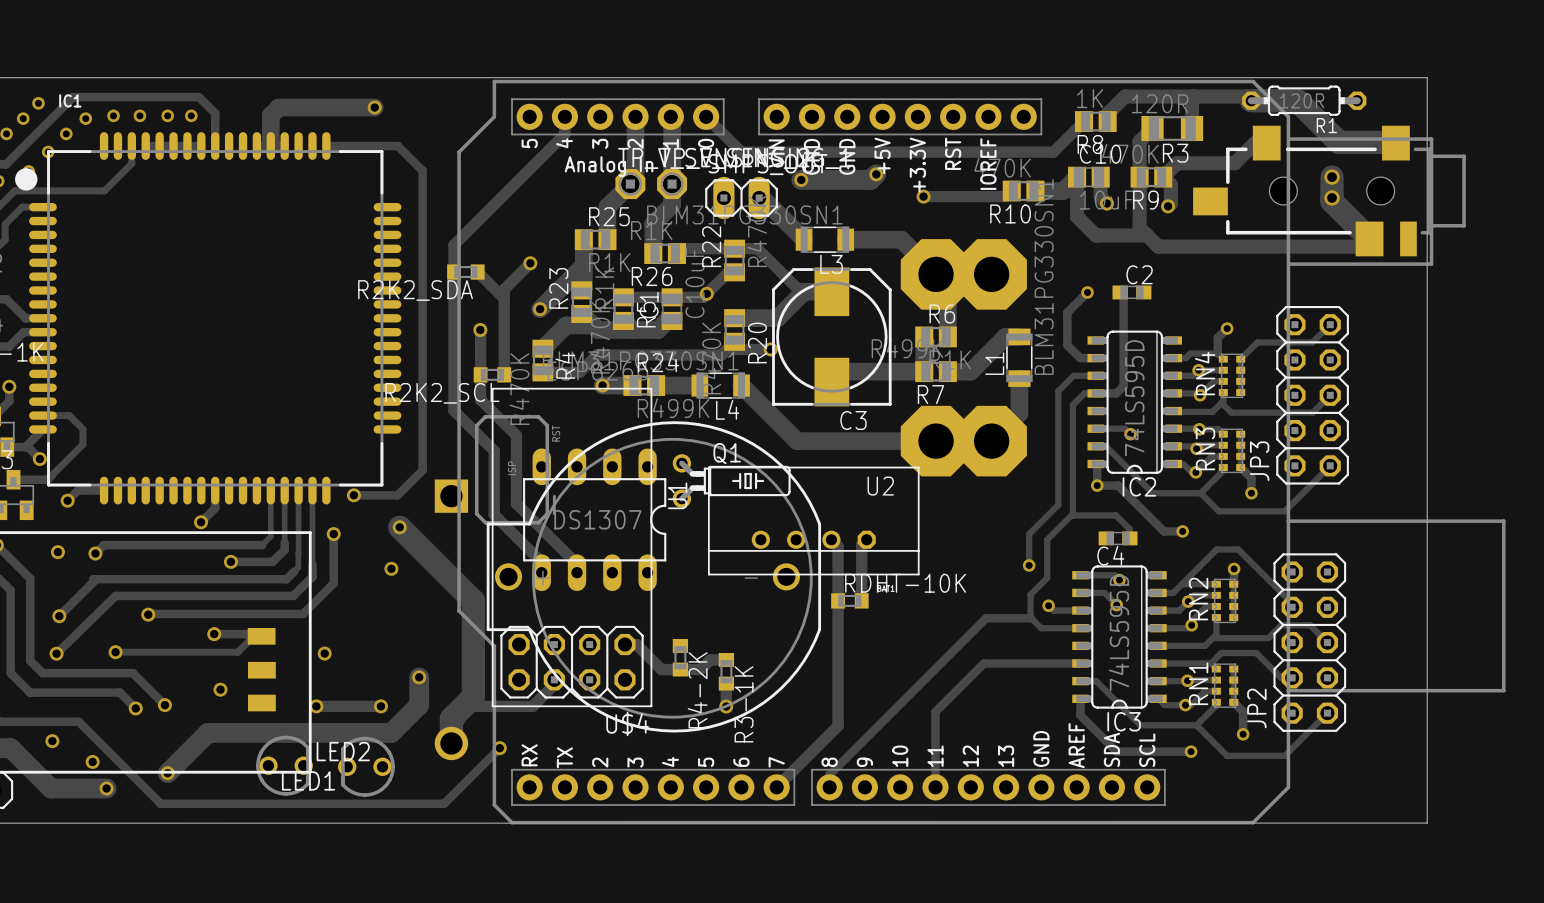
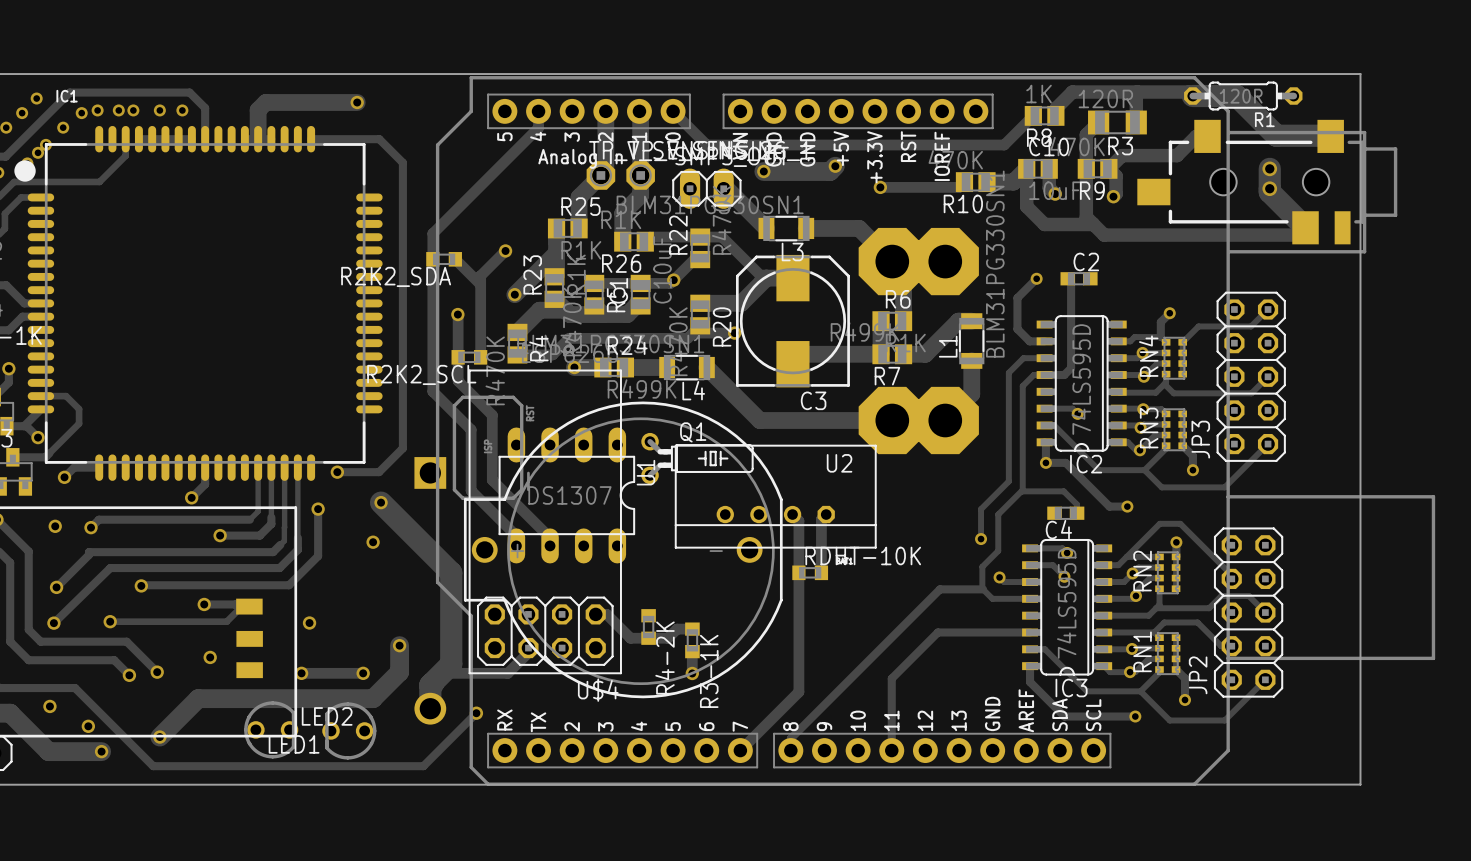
via: none -> (97, 110)
via: (113, 115) -> none
via: none -> (118, 110)
via: none -> (38, 152)

